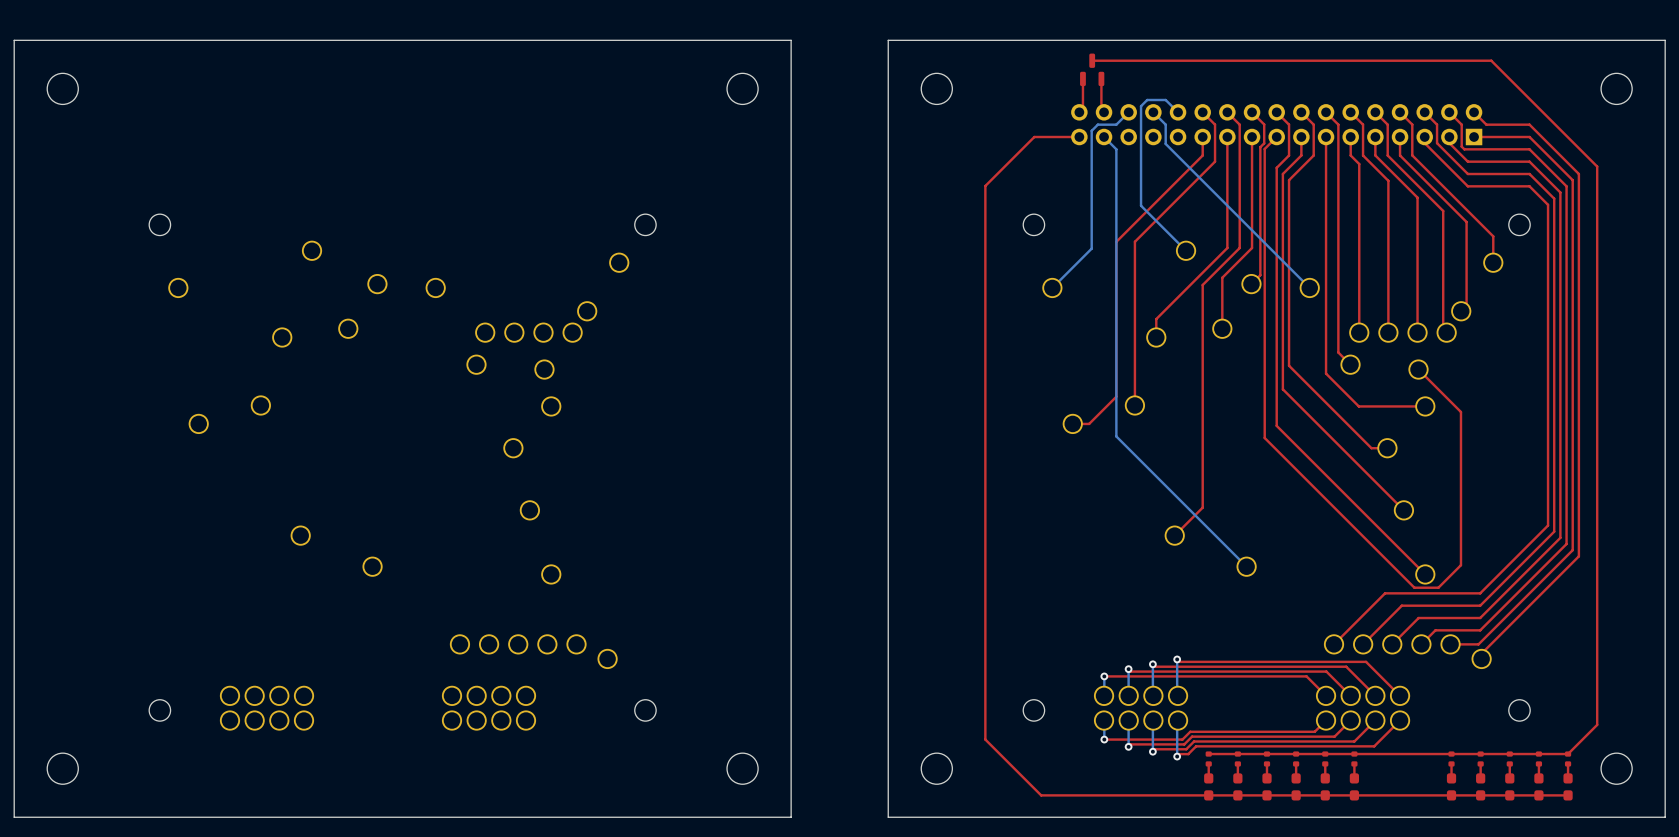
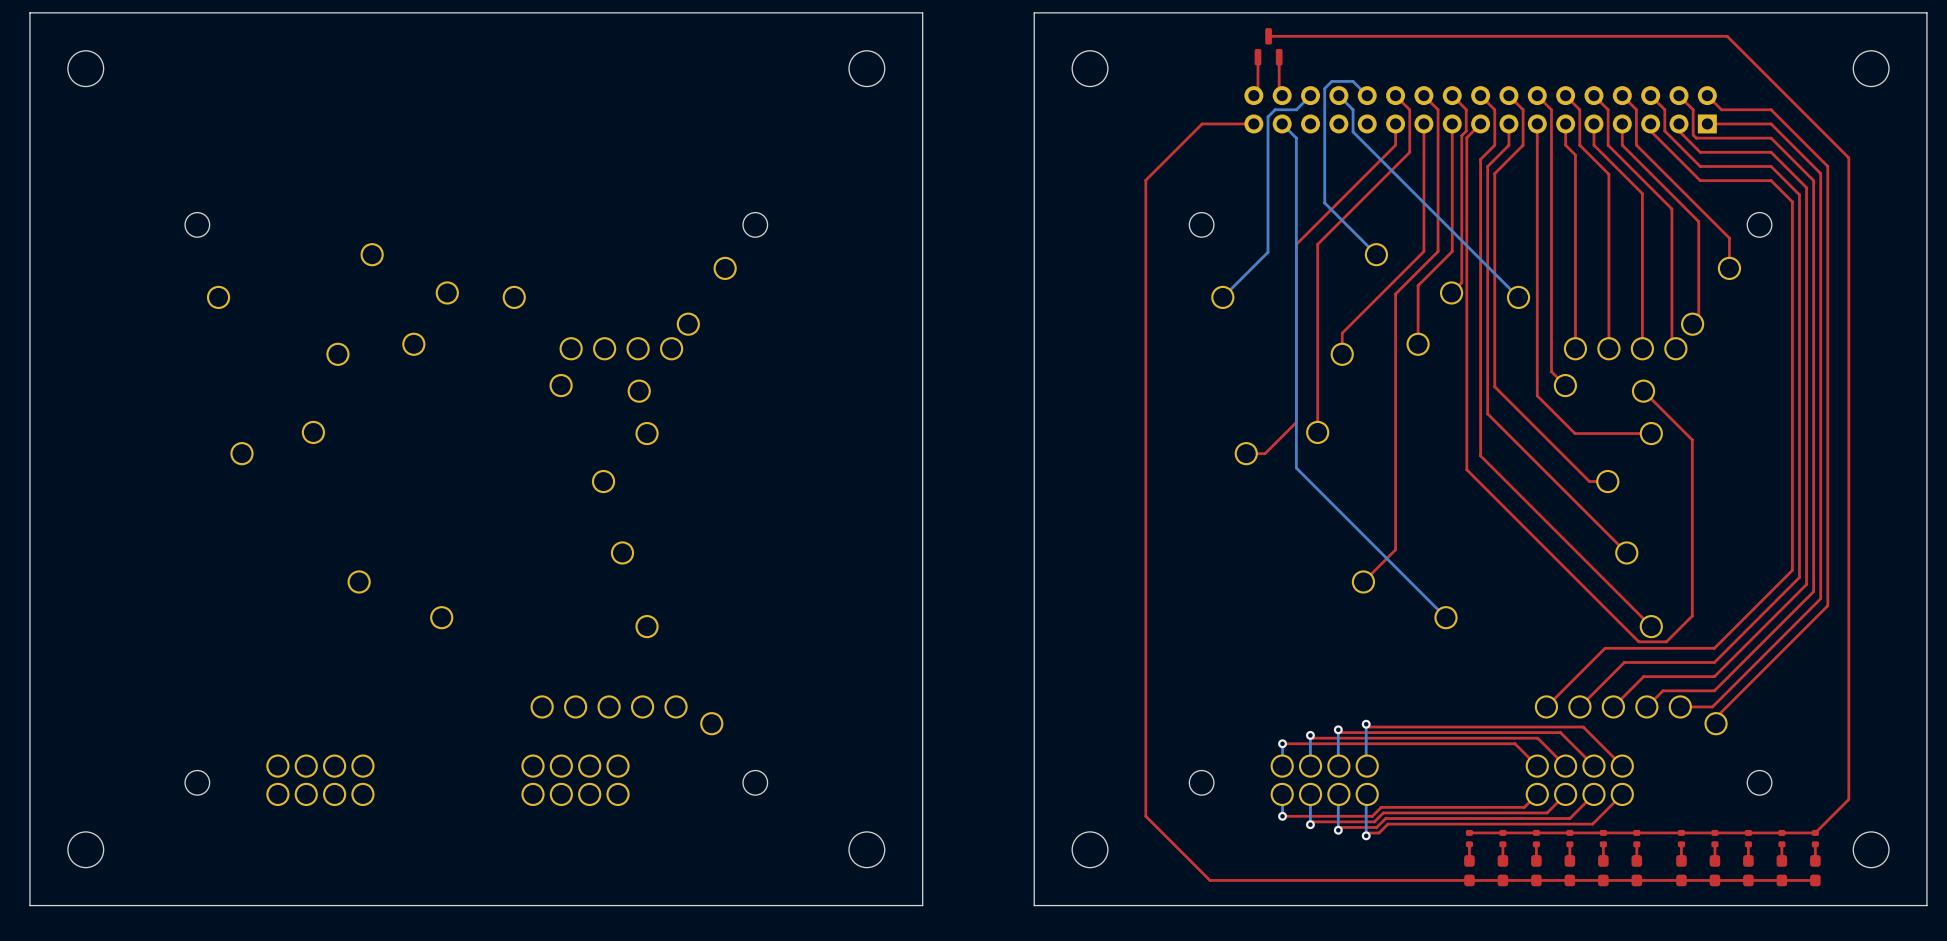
top track: (1267, 754) (1208, 754) -> none
part: (1208, 758) -> none
part: (1237, 758) -> none
part: none -> (1603, 838)
part: none -> (1636, 838)
top track: (1208, 763) (1208, 778) -> (1636, 844) (1636, 860)
top track: (1237, 763) (1237, 778) -> (1603, 844) (1603, 860)
part: (1208, 786) -> none
part: (1237, 786) -> none
part: none -> (1603, 870)
part: none -> (1636, 870)

